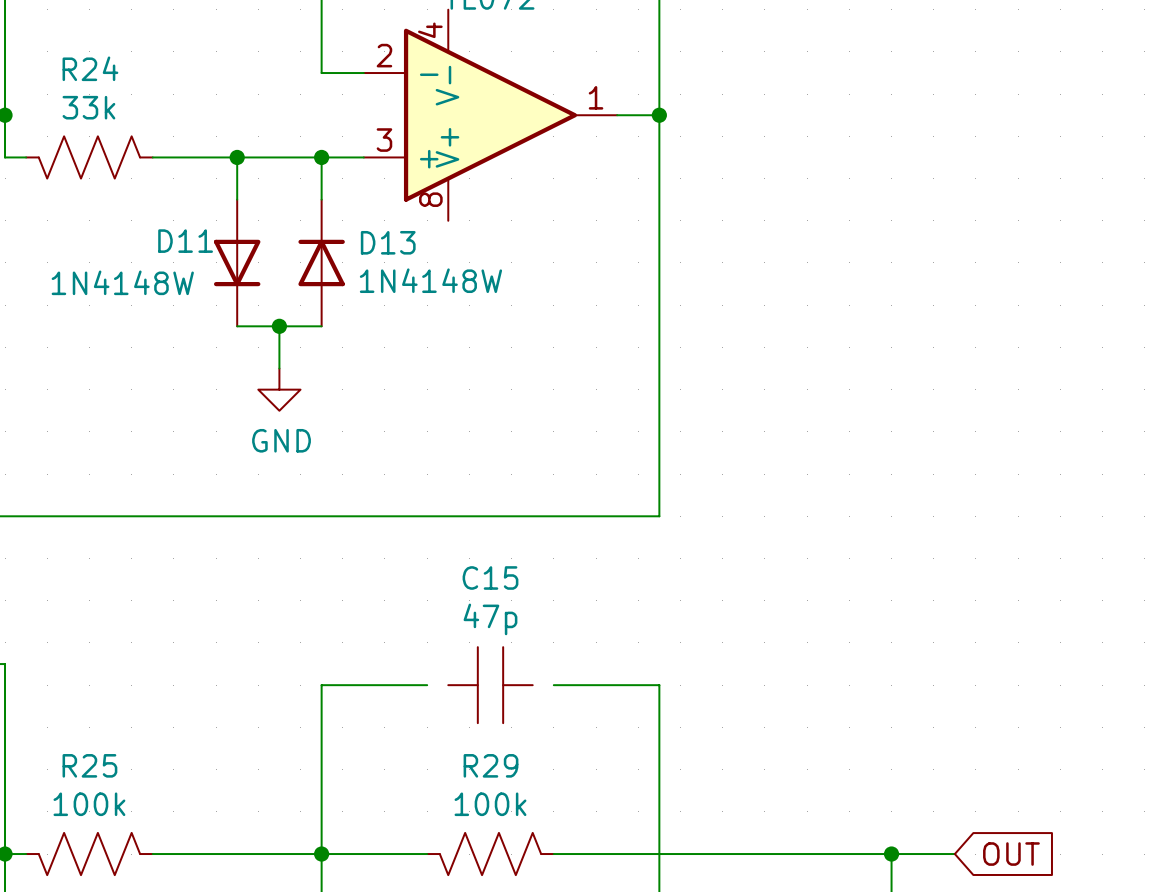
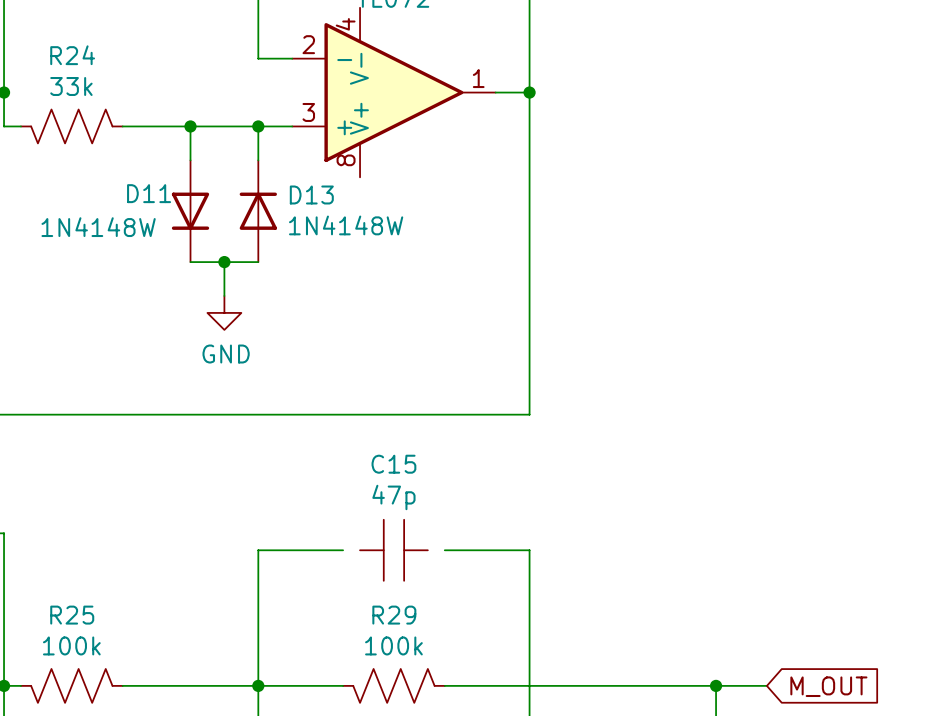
global label: OUT (1011, 854) -> M_OUT (828, 686)

